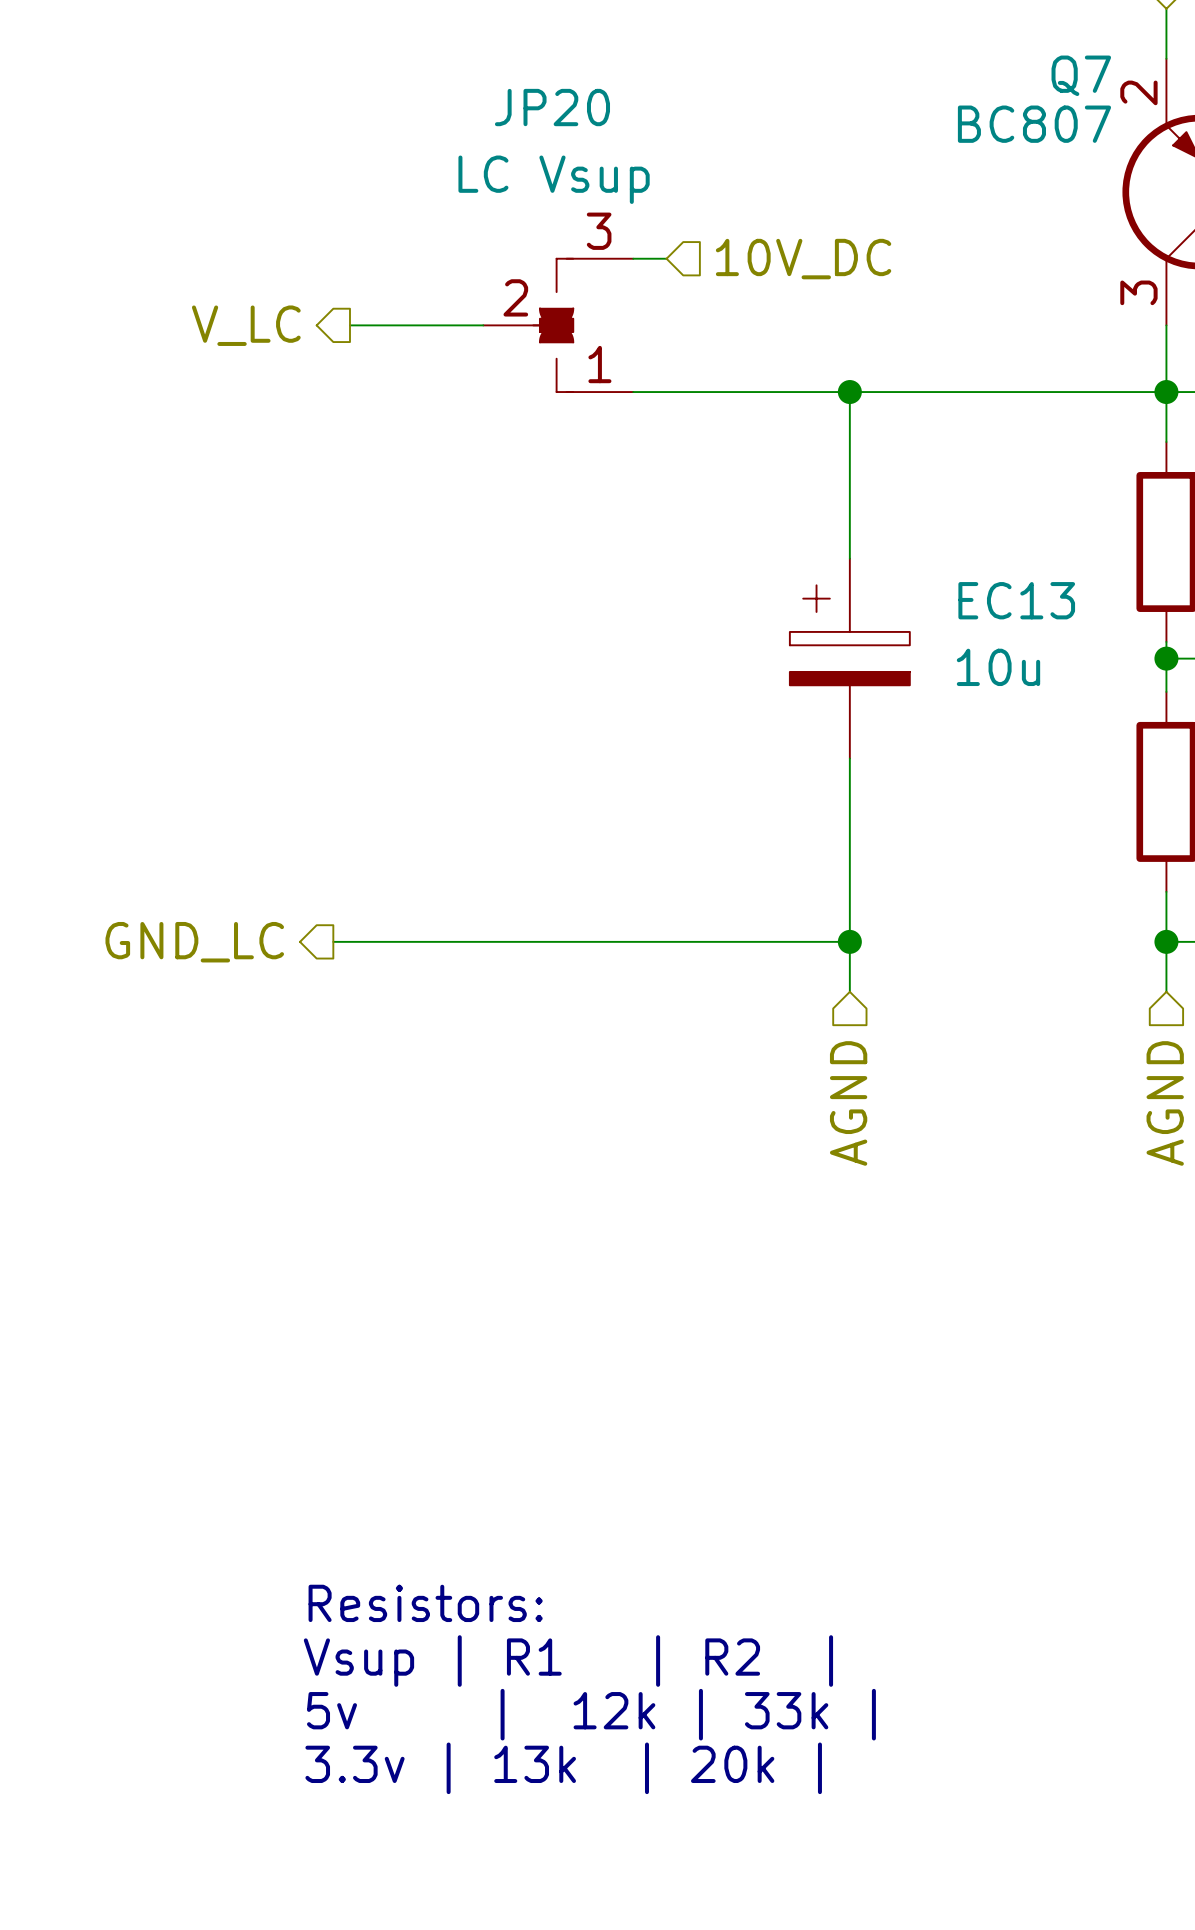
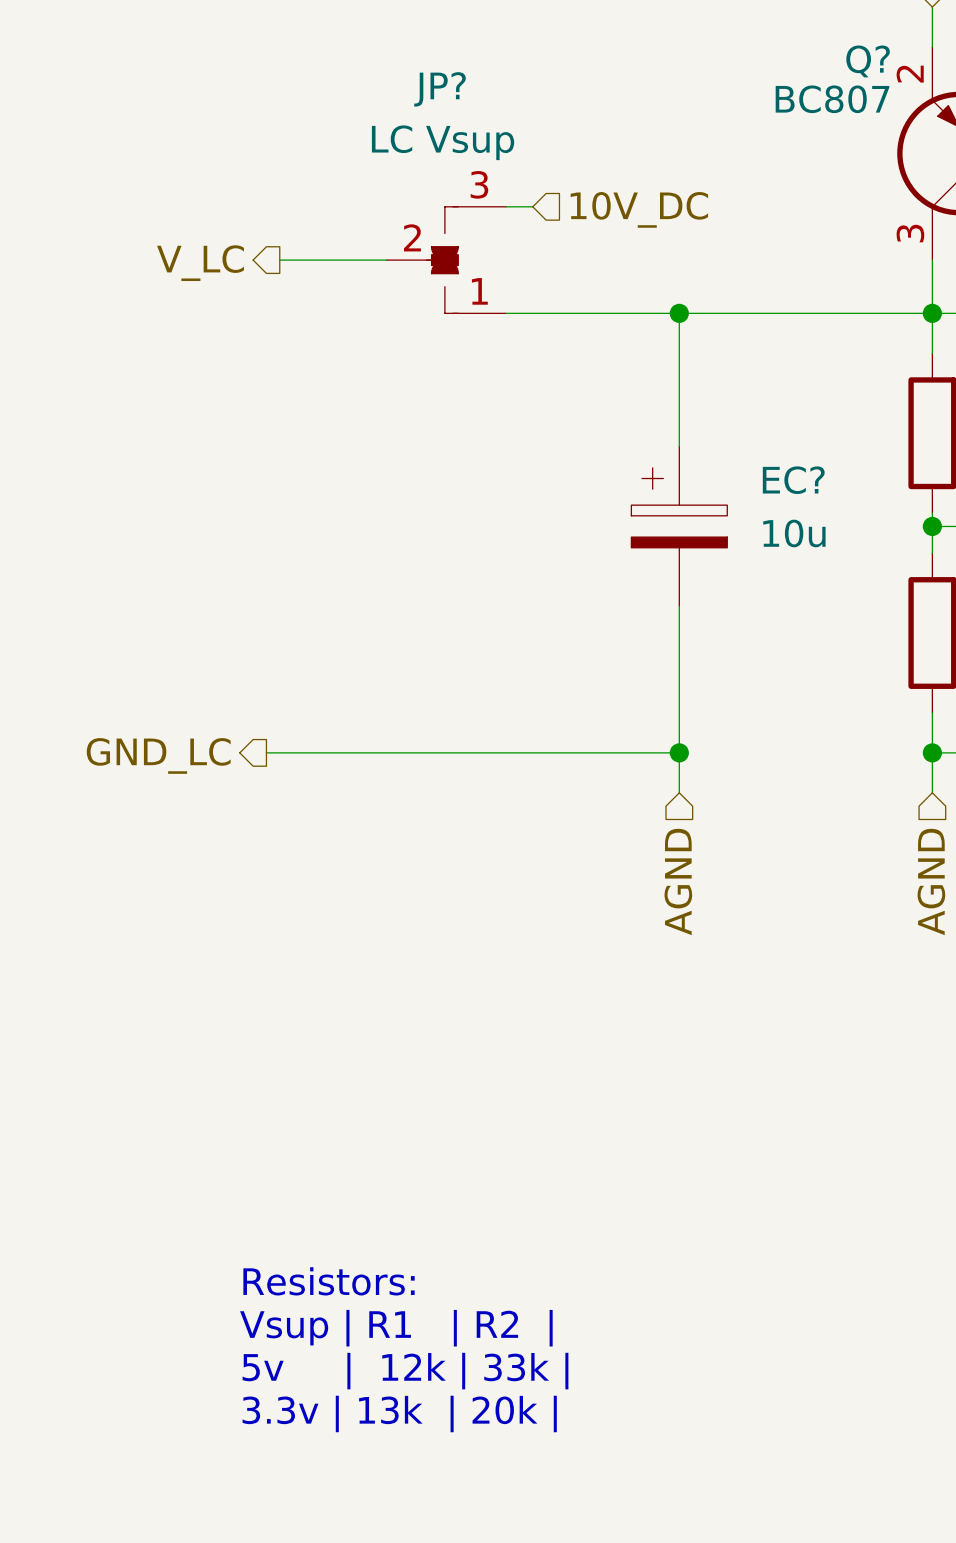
Q7 name: Q7 (1081, 75) -> Q? (868, 61)
JP20 name: JP20 (552, 107) -> JP? (440, 89)
EC13 name: EC13 (1016, 600) -> EC? (793, 480)

